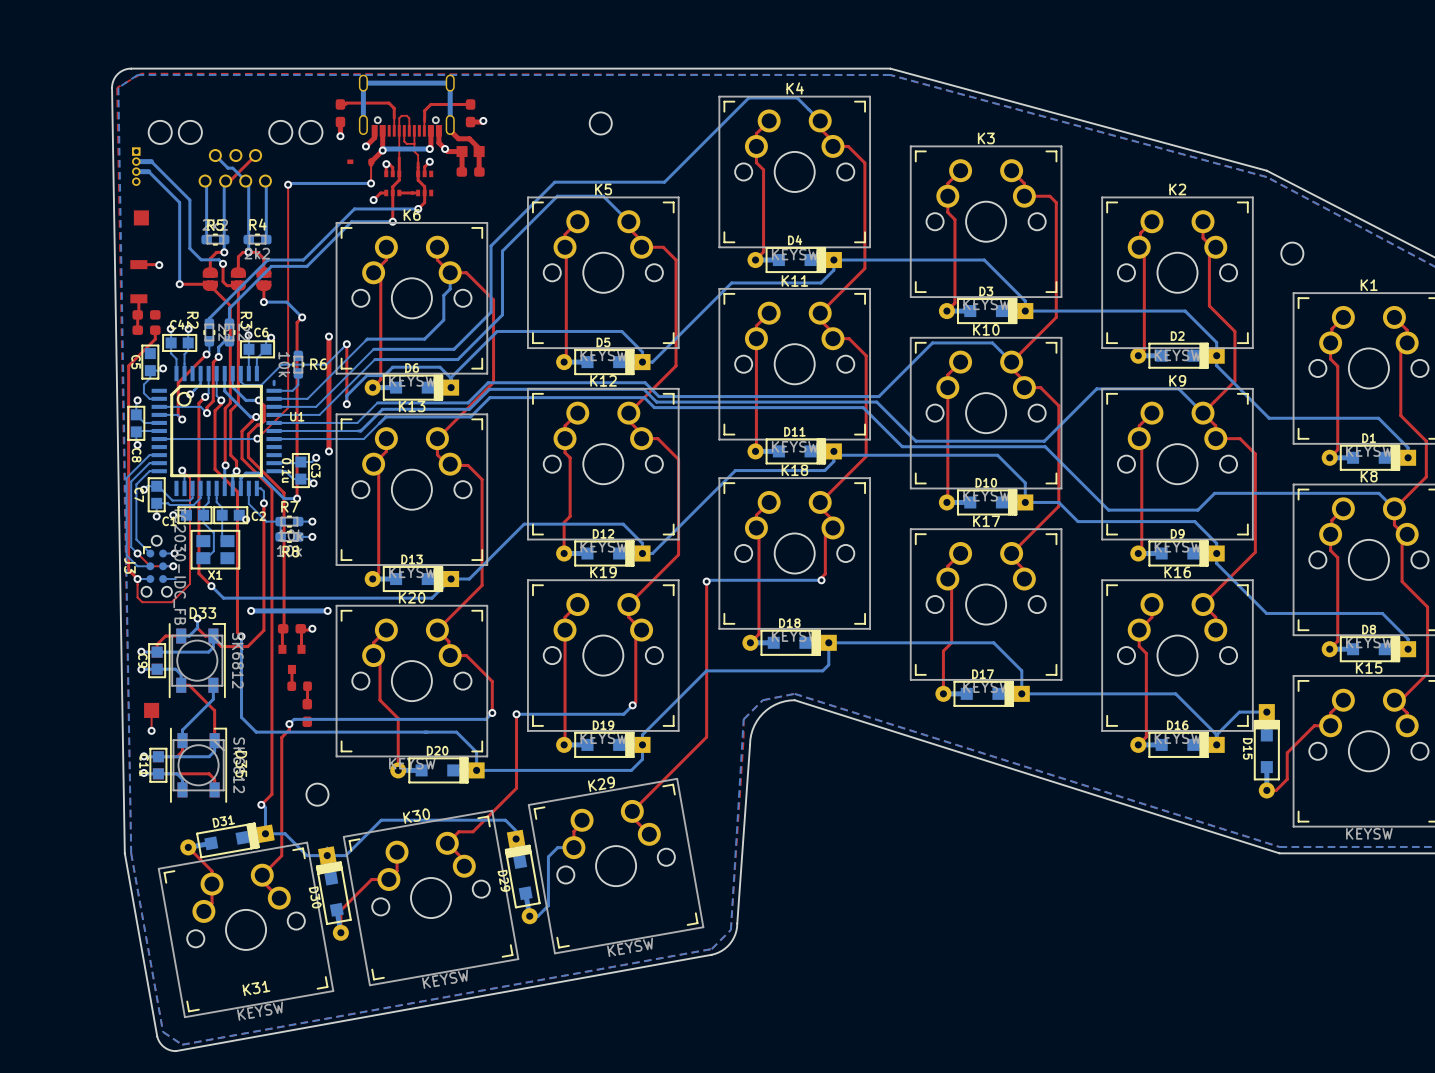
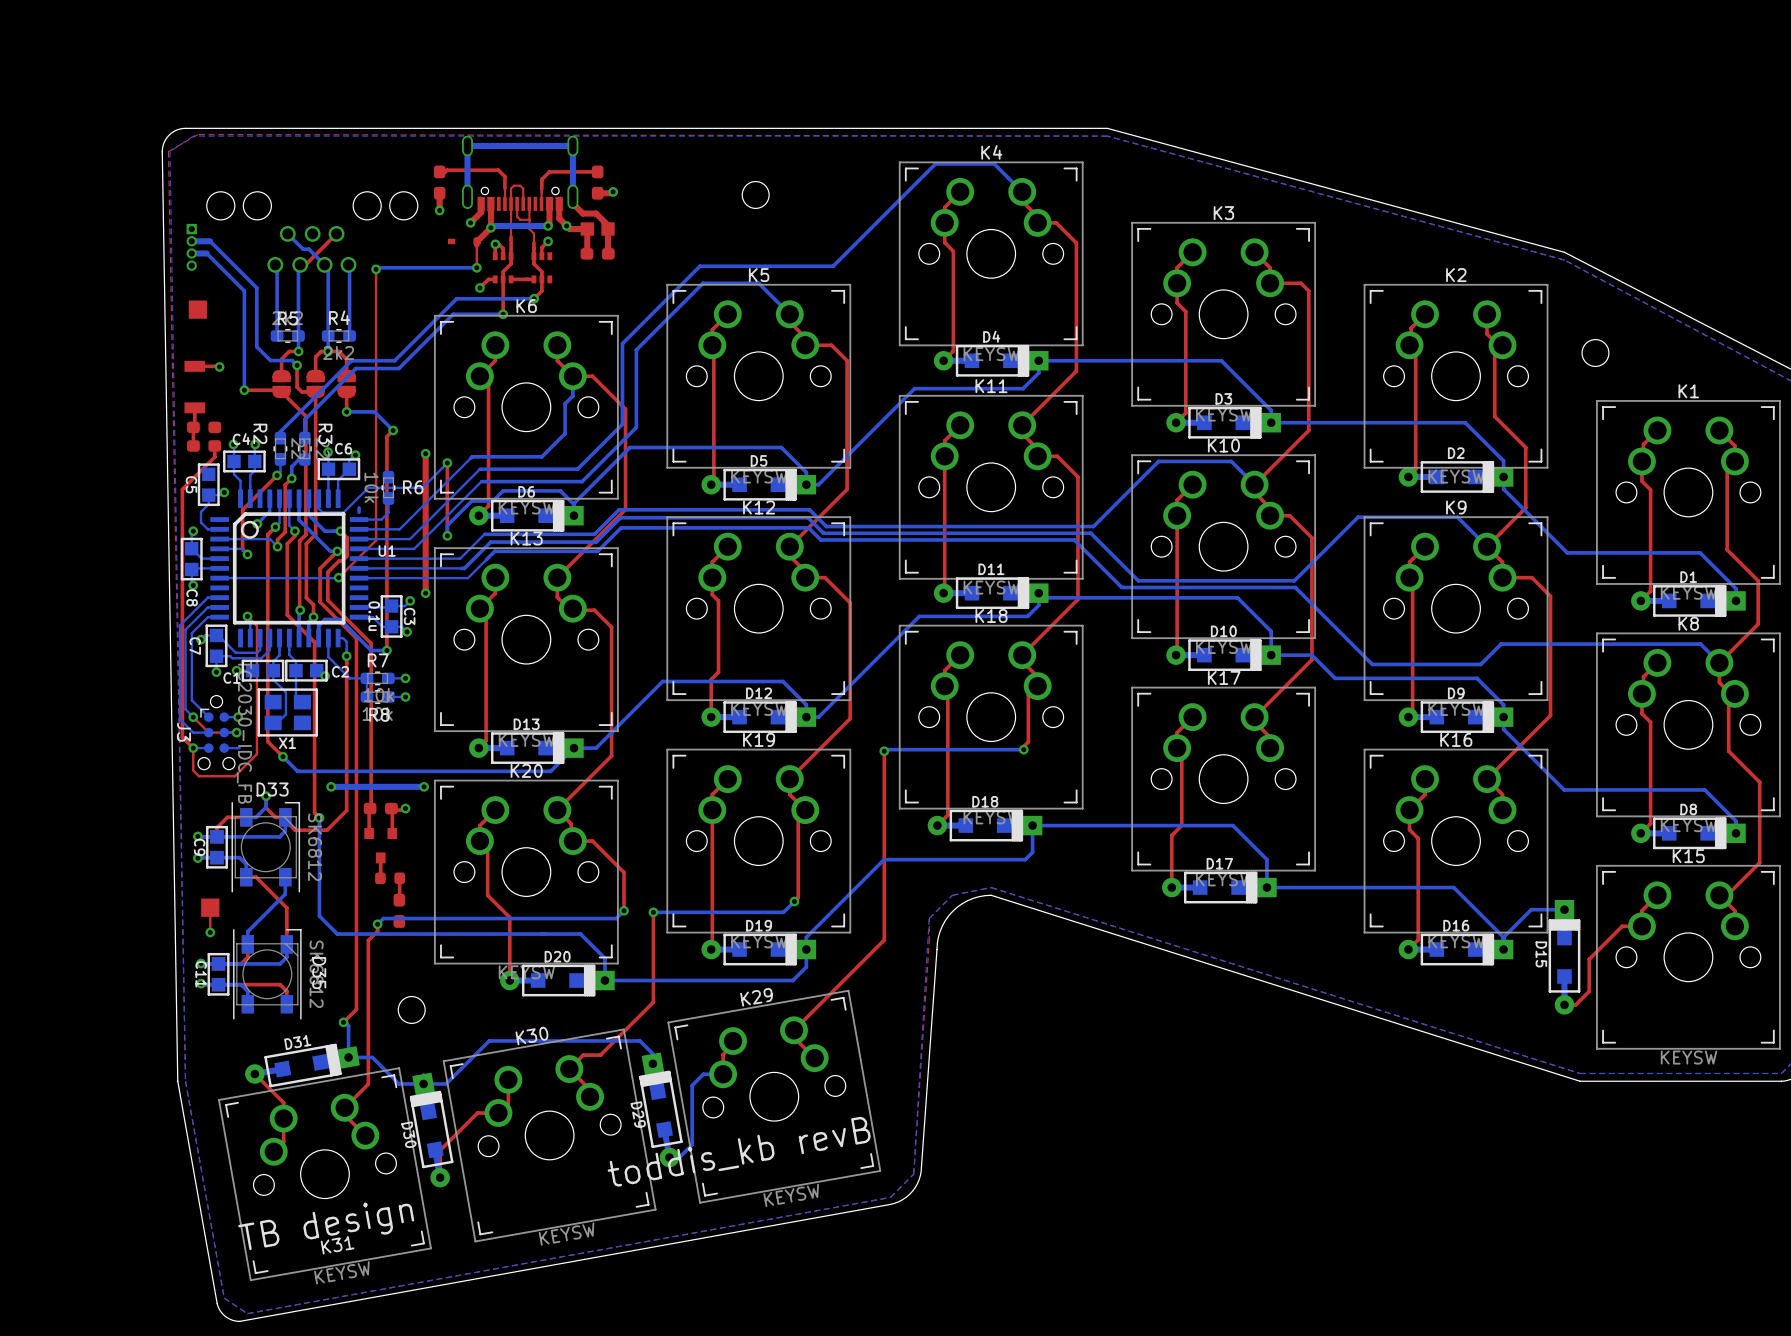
text: none -> toddis_kb revB (739, 1151)
text: none -> TB design (326, 1226)

